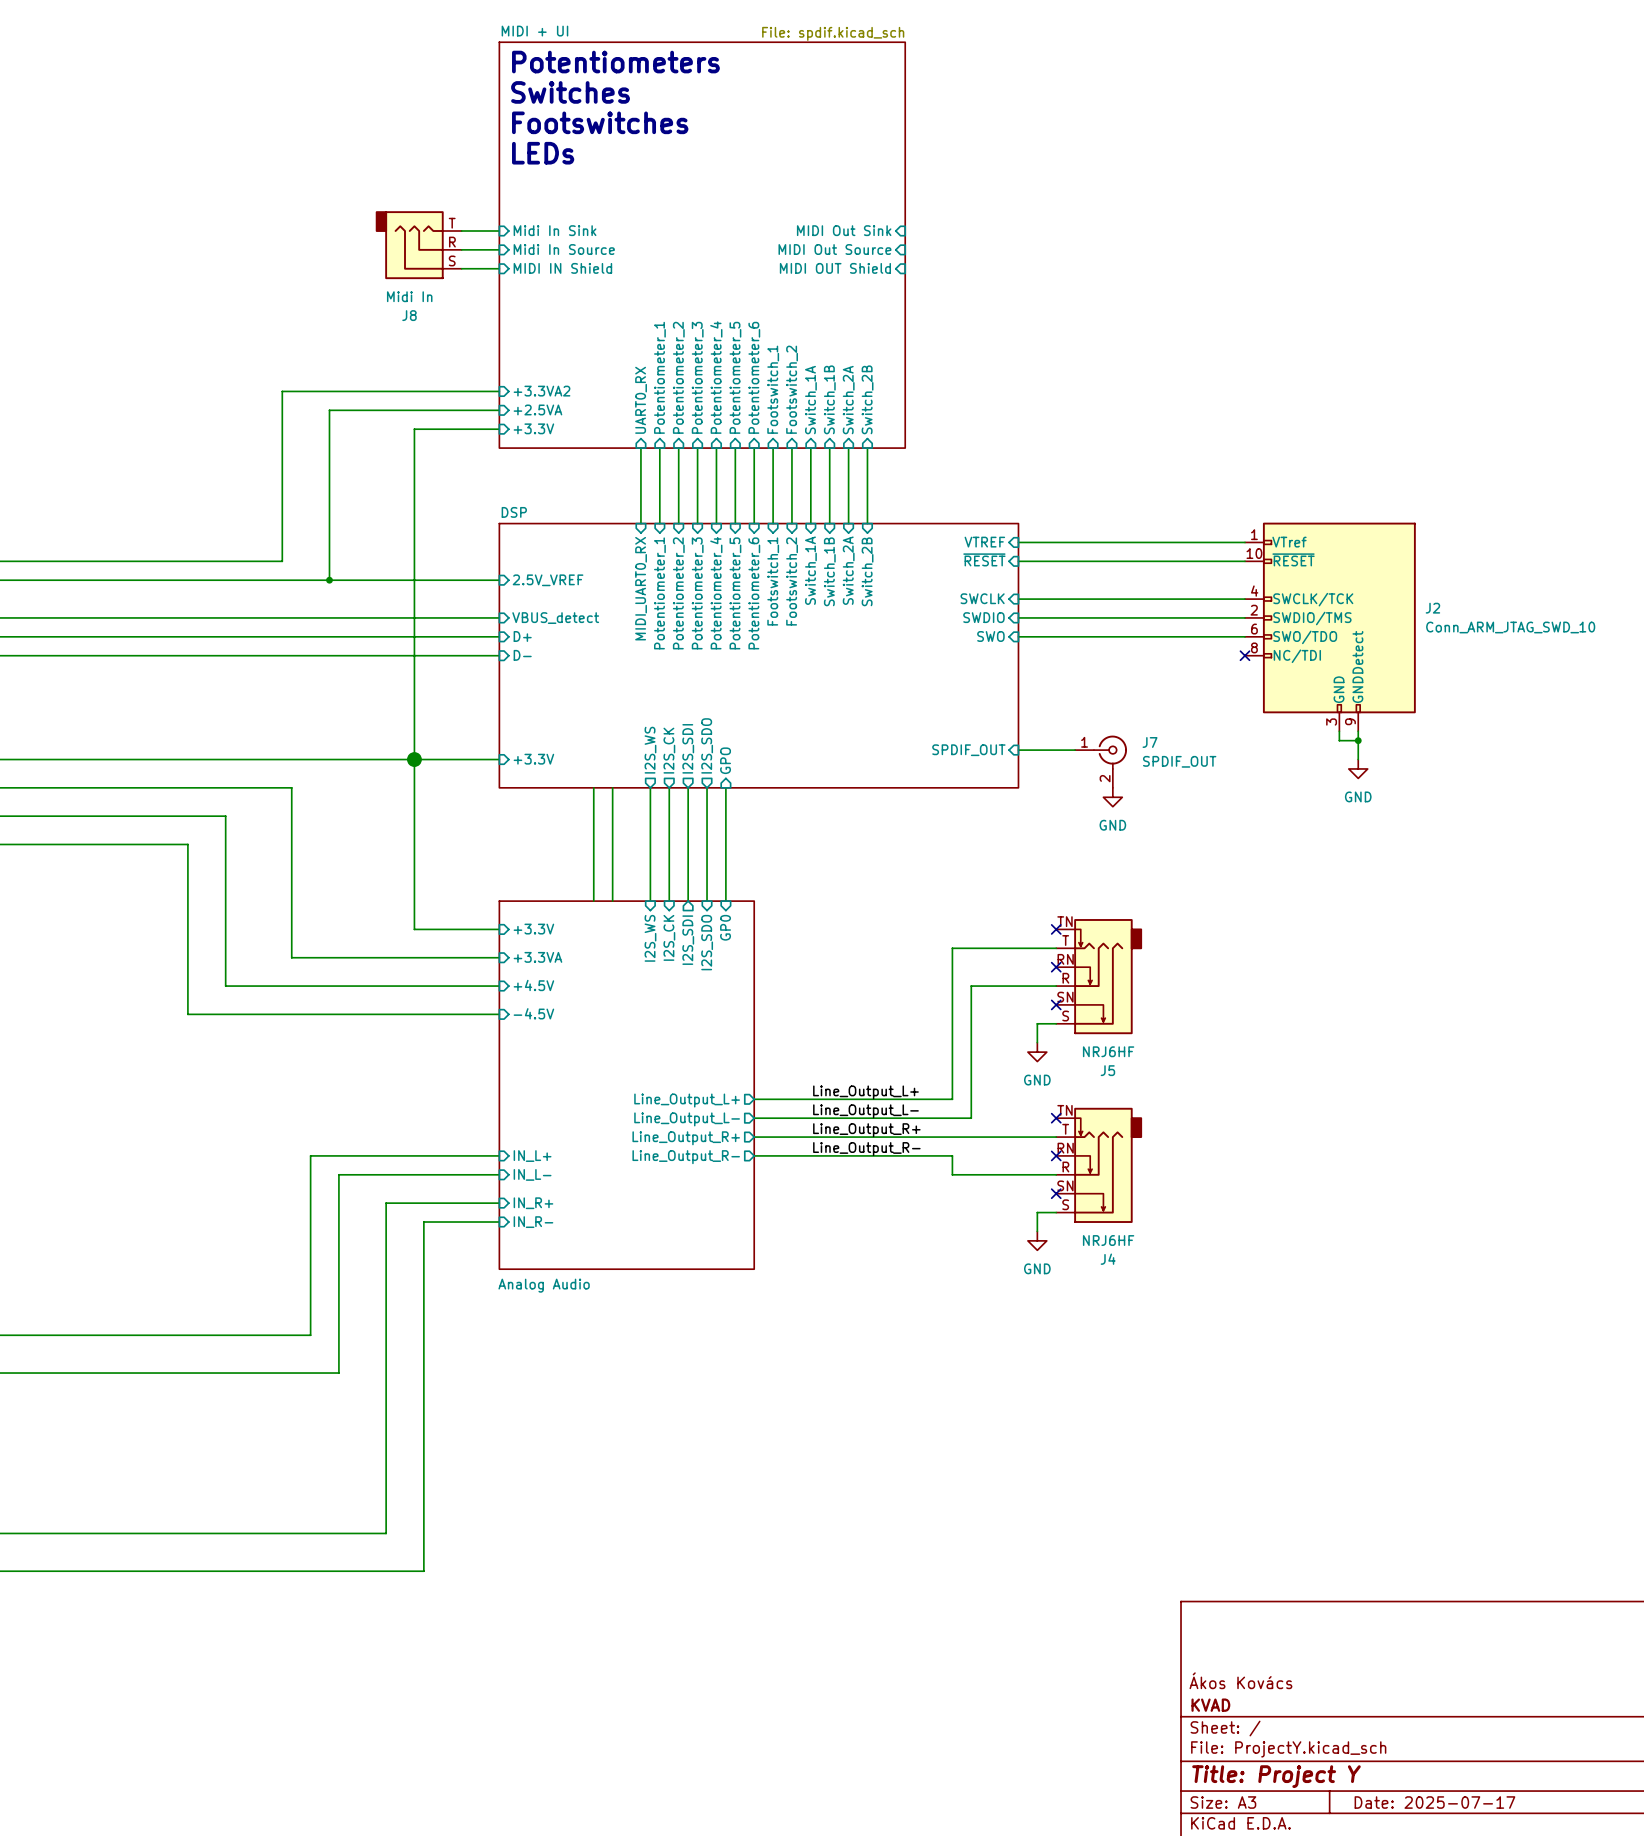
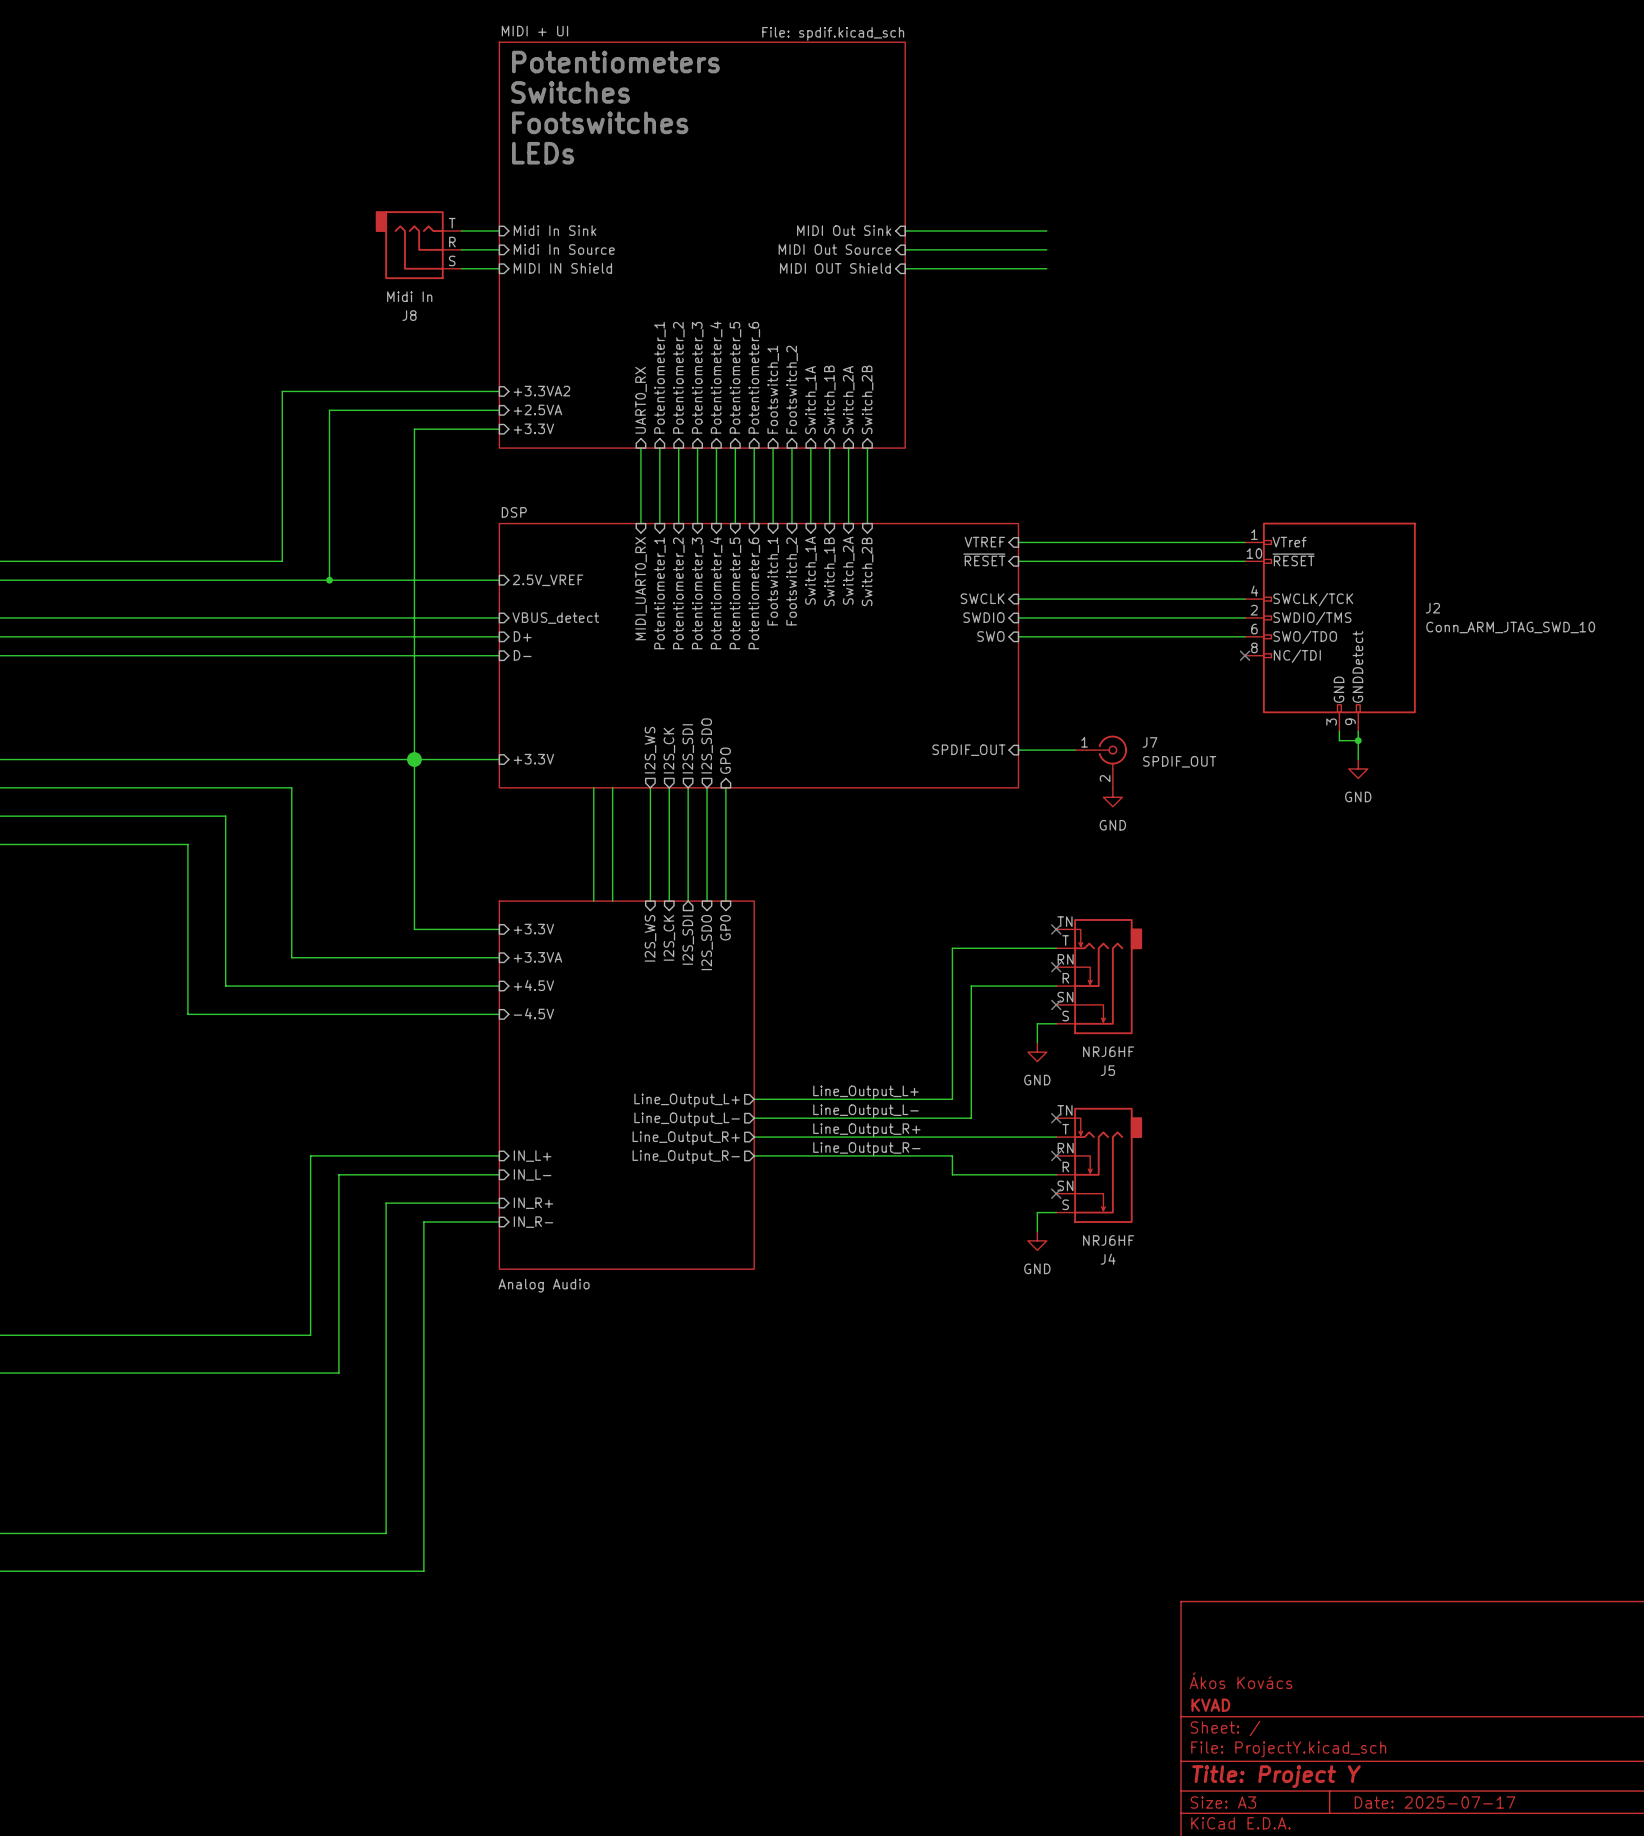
wire: none -> (905, 231) (1046, 231)
wire: none -> (905, 249) (1046, 249)
wire: none -> (905, 268) (1046, 268)

